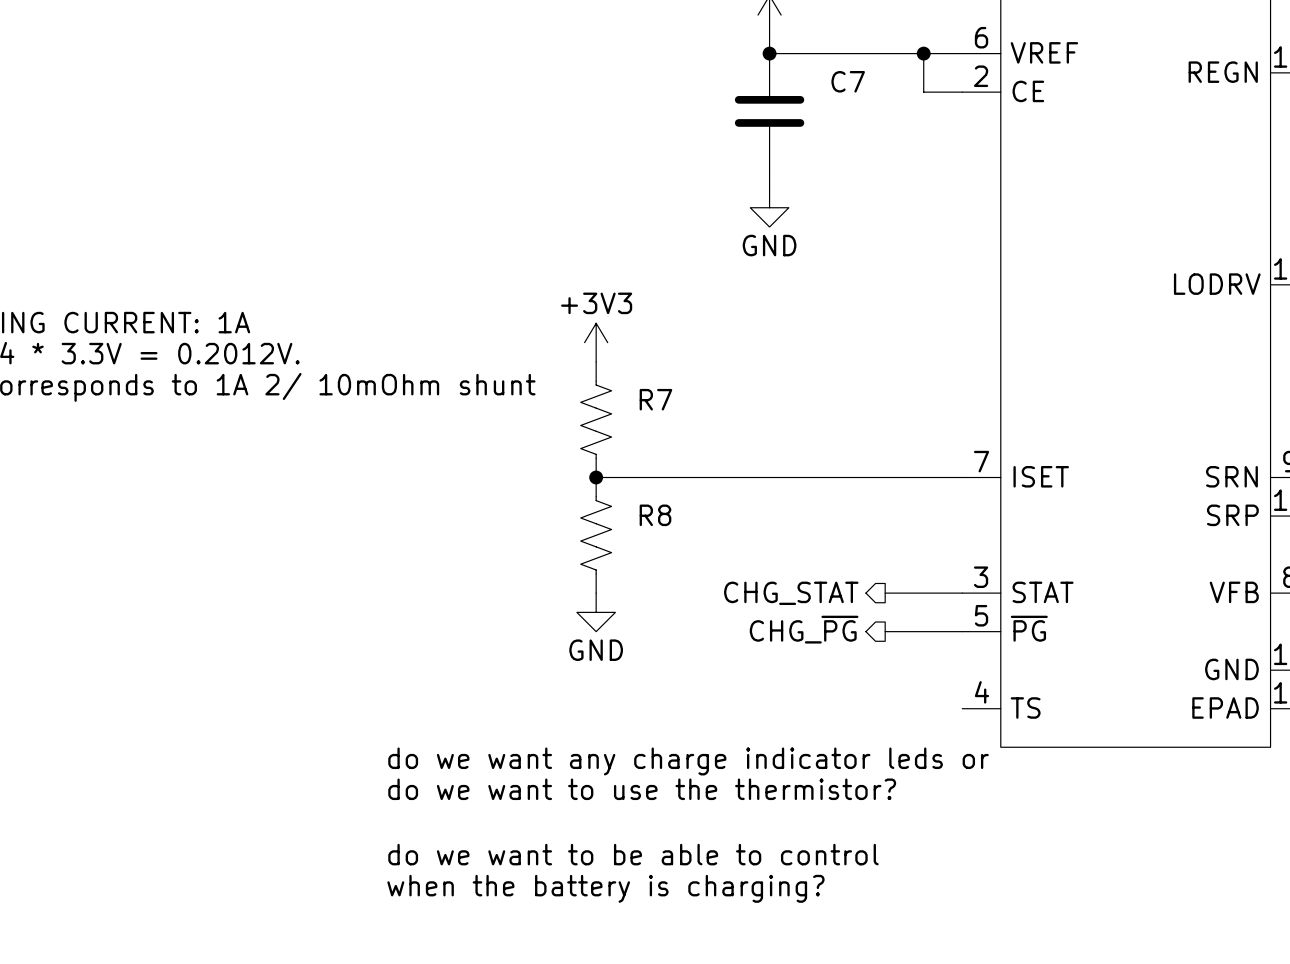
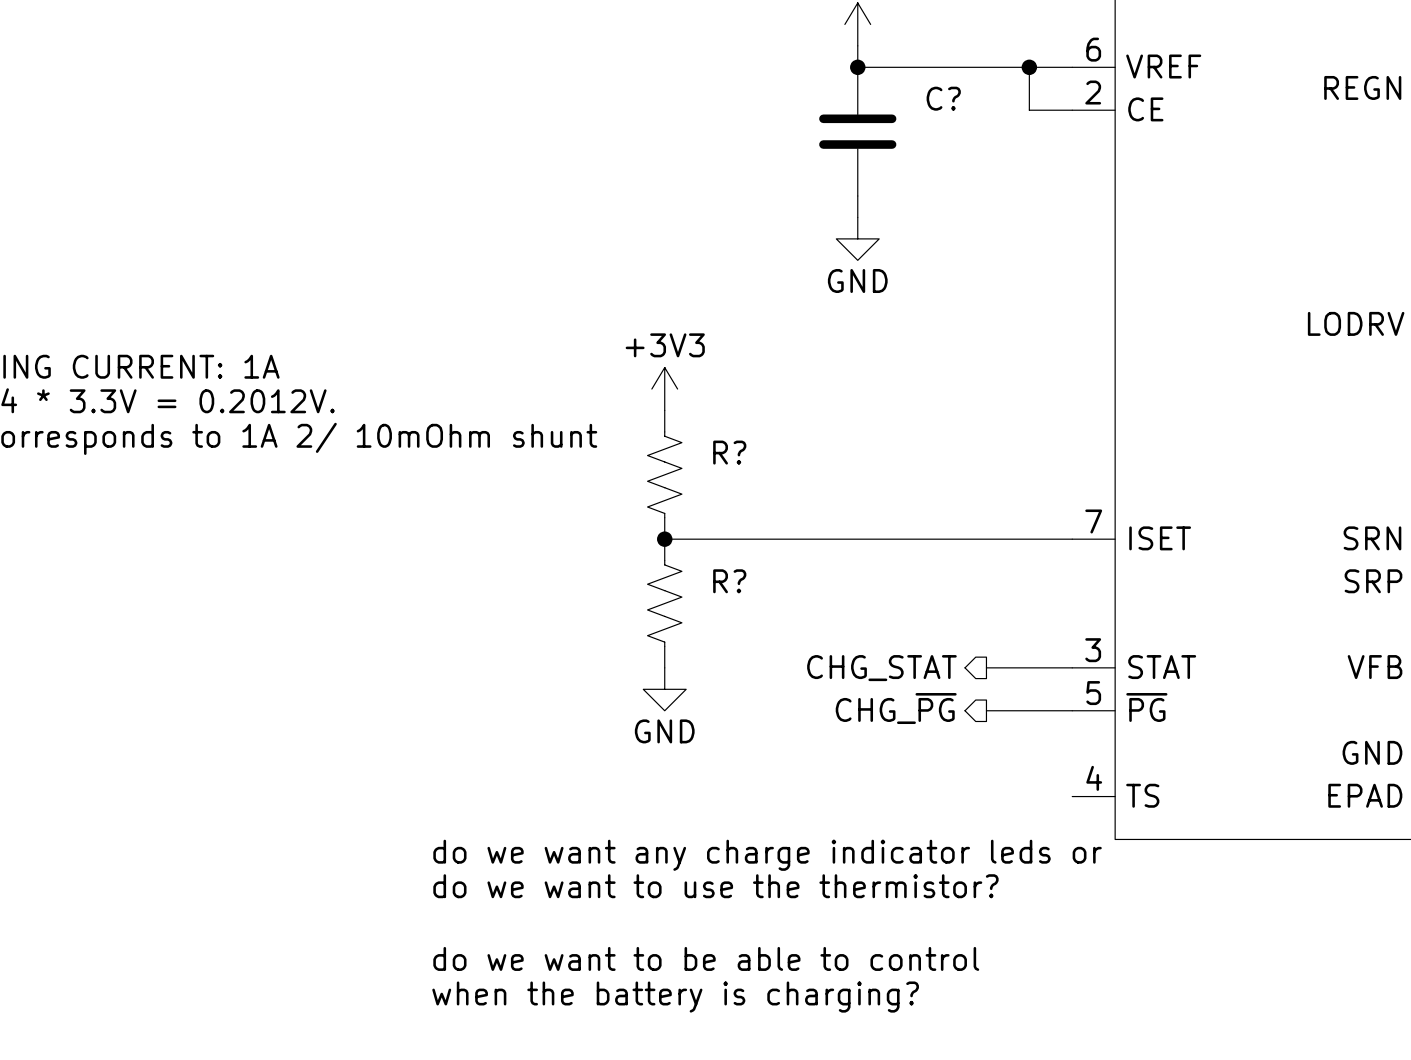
C7 name: C7 (848, 81) -> C? (943, 98)
R7 name: R7 (655, 399) -> R? (729, 452)
R8 name: R8 (655, 515) -> R? (729, 581)

